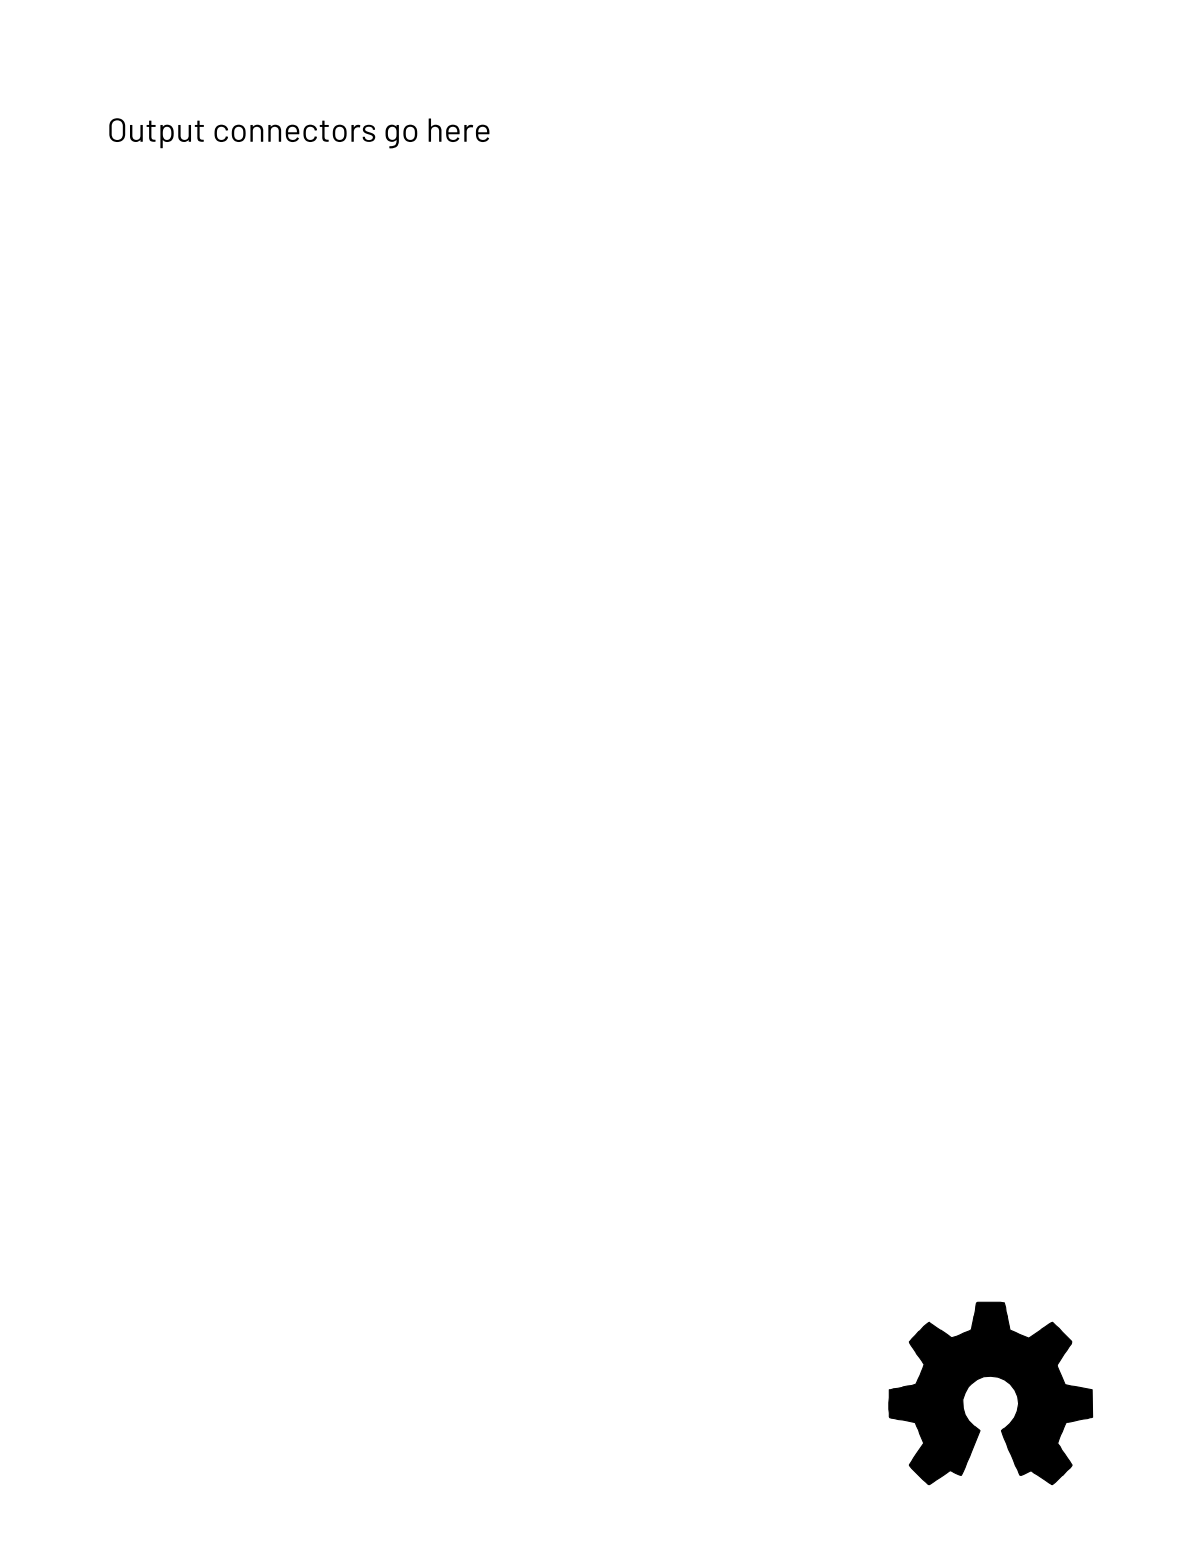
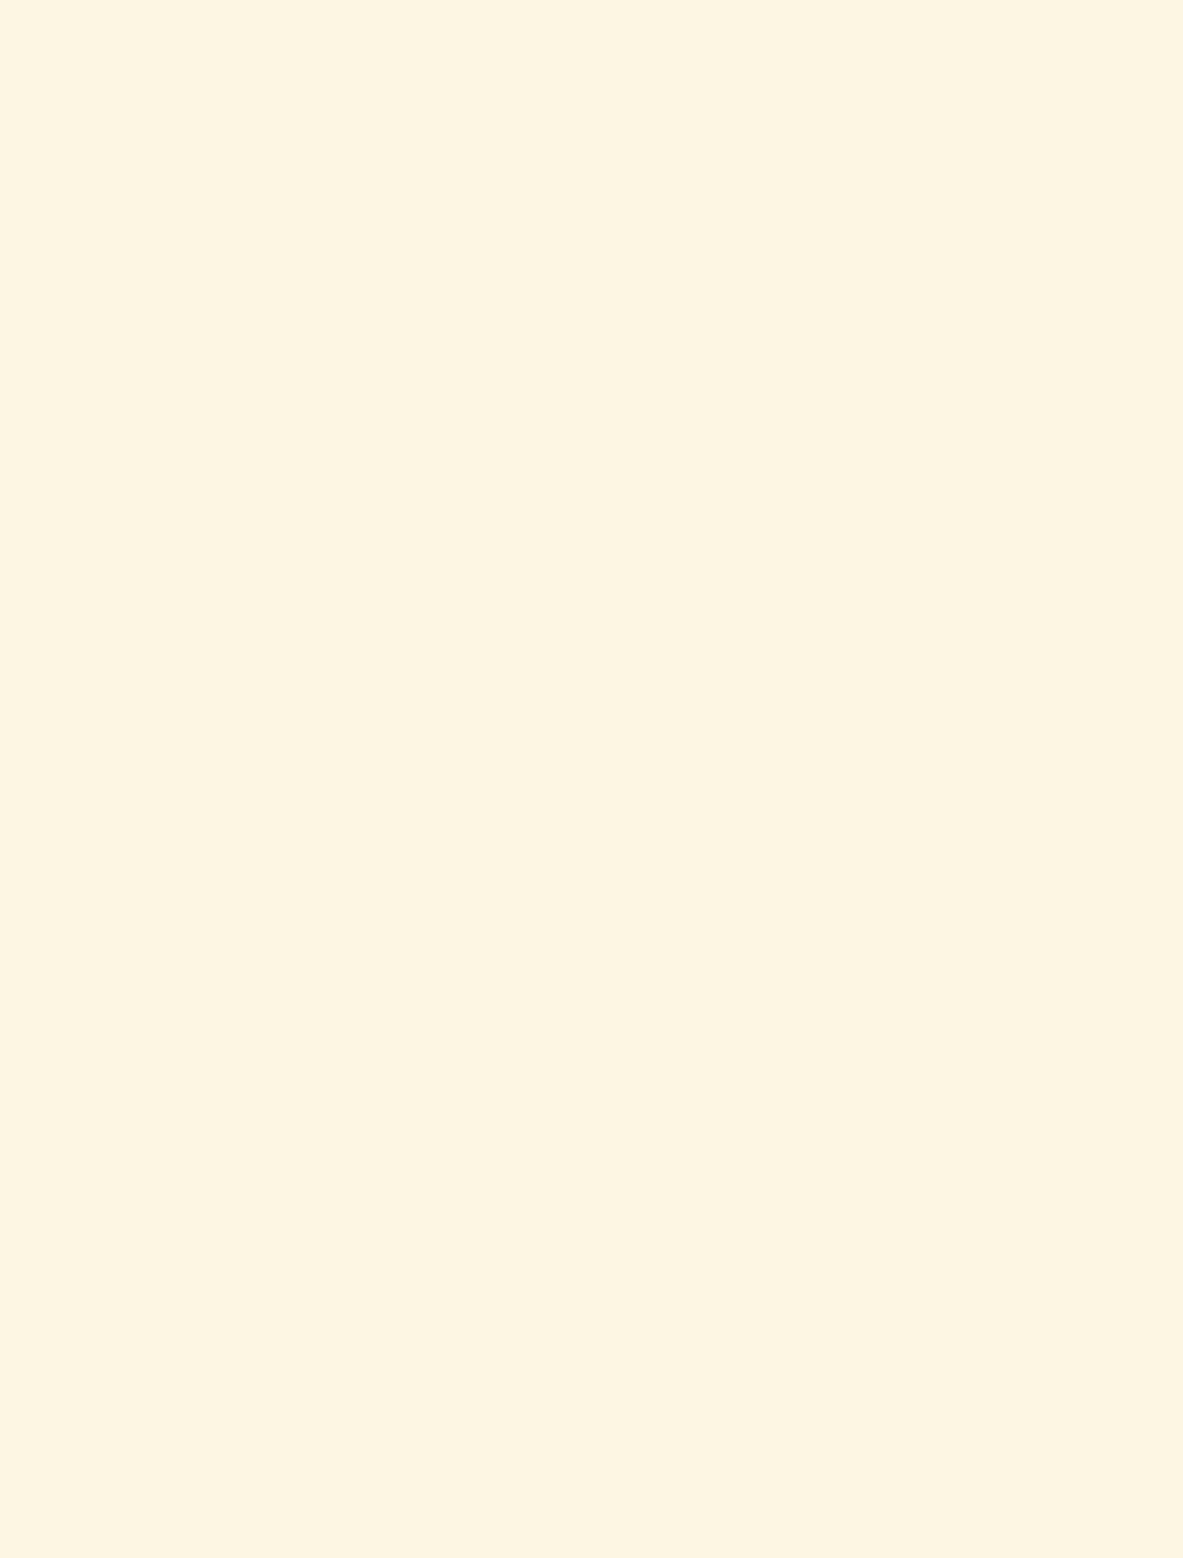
text: Output connectors go here (299, 133) -> none
part: (990, 1393) -> none

